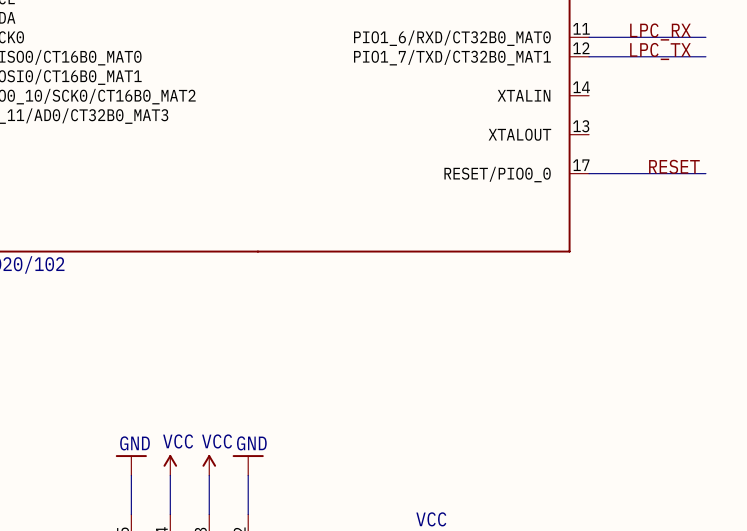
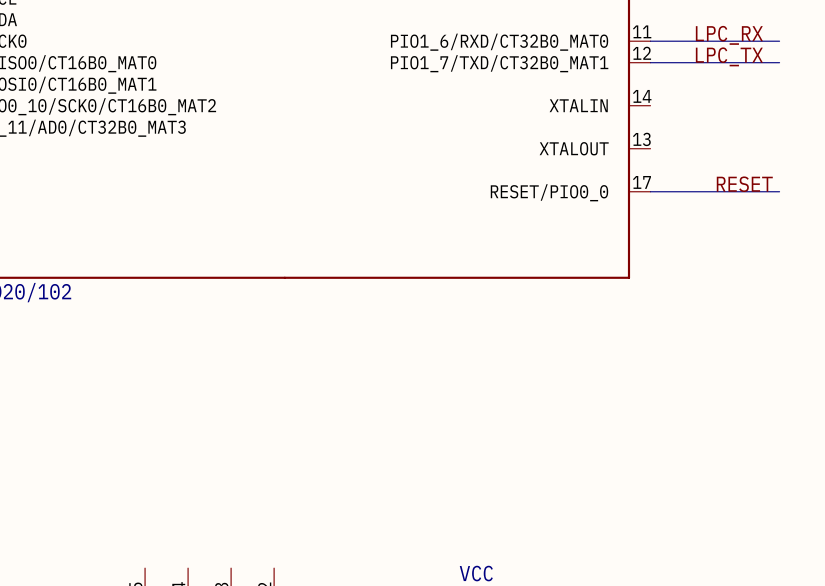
power symbol: GND (131, 465) -> none
power symbol: VCC (170, 465) -> none
power symbol: VCC (209, 465) -> none
power symbol: GND (248, 465) -> none
wire: (131, 475) (131, 514) -> none
wire: (170, 475) (170, 514) -> none
wire: (209, 475) (209, 514) -> none
wire: (248, 475) (248, 514) -> none

